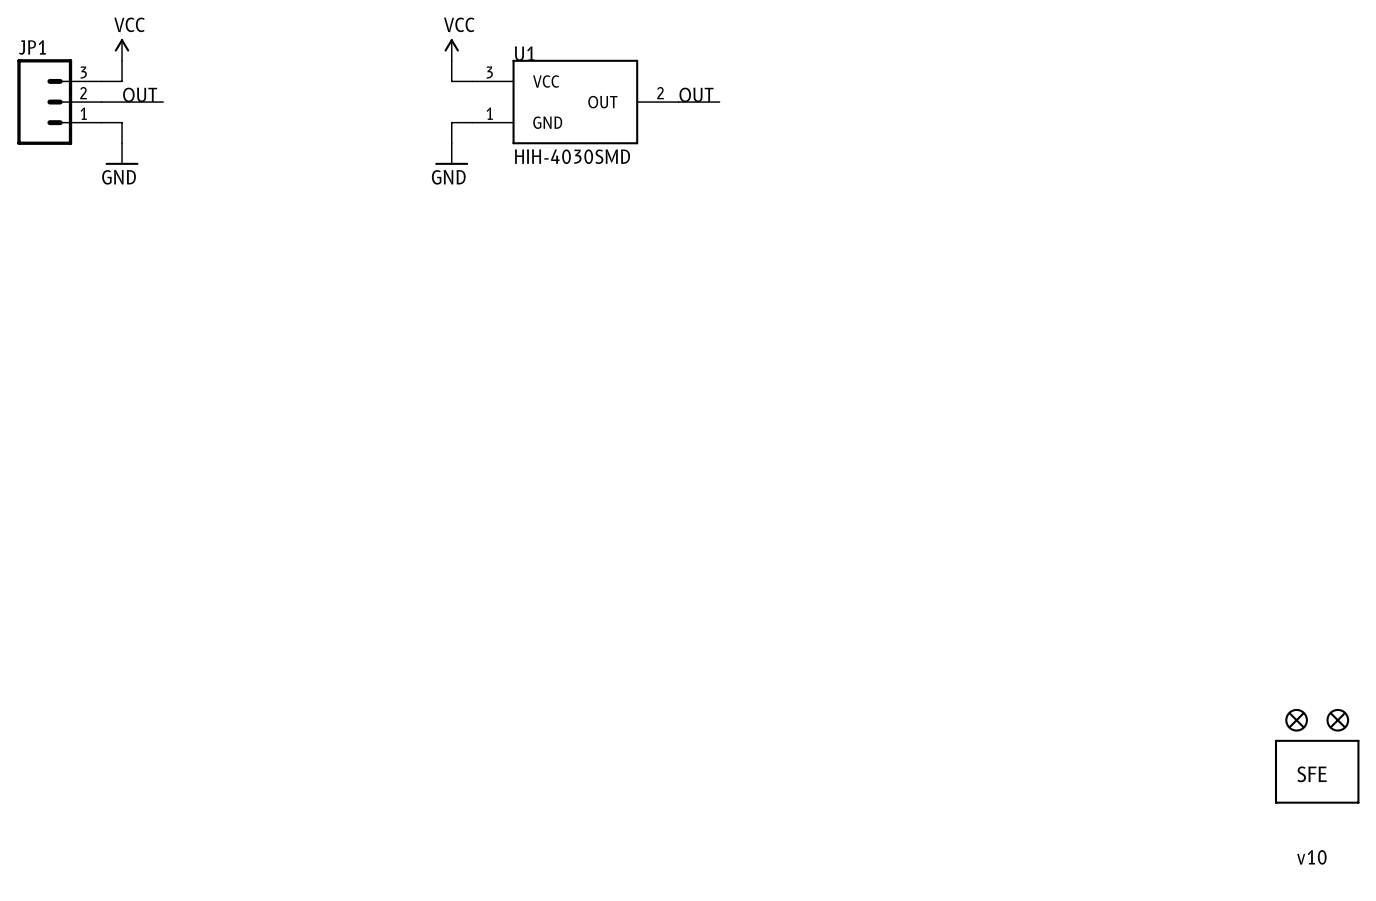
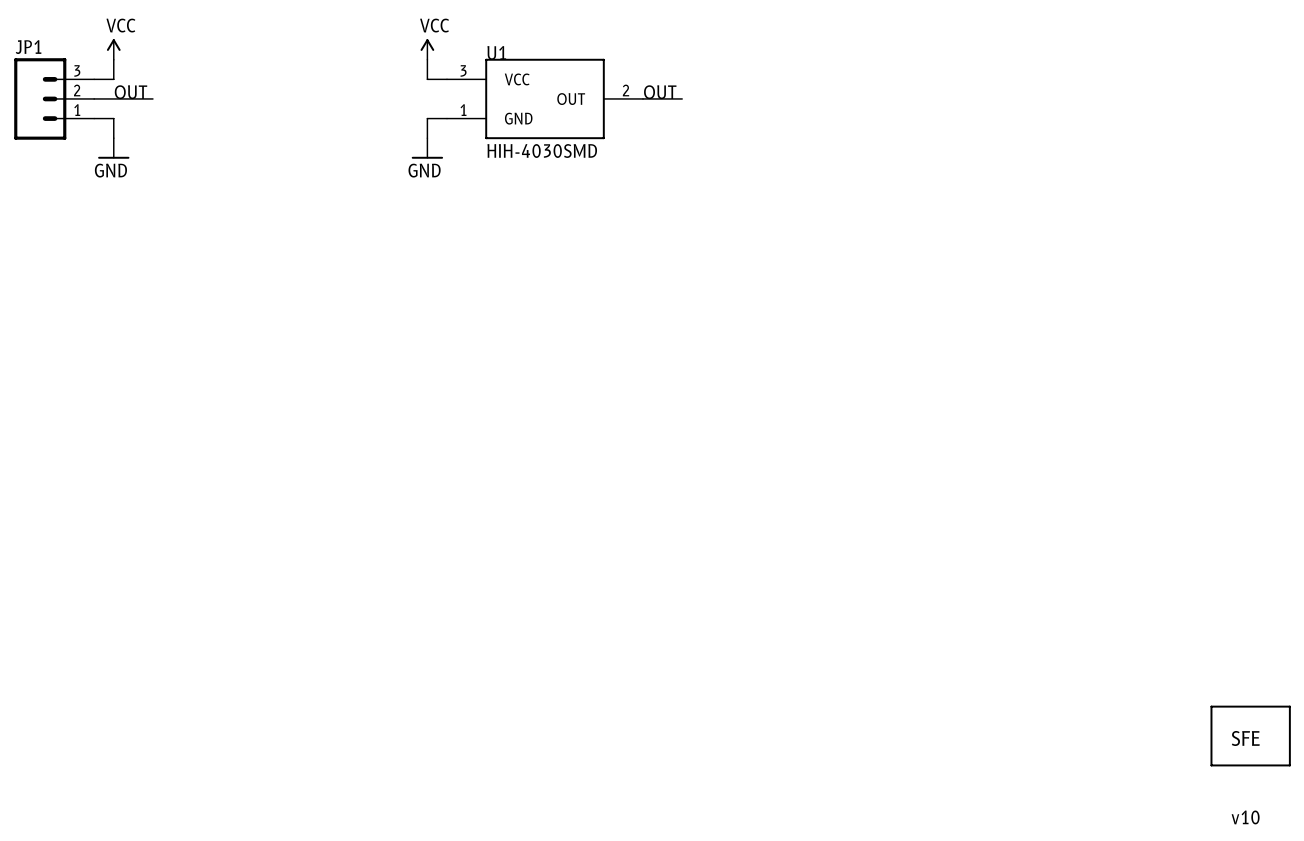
part: (1296, 720) -> none
part: (1337, 720) -> none

